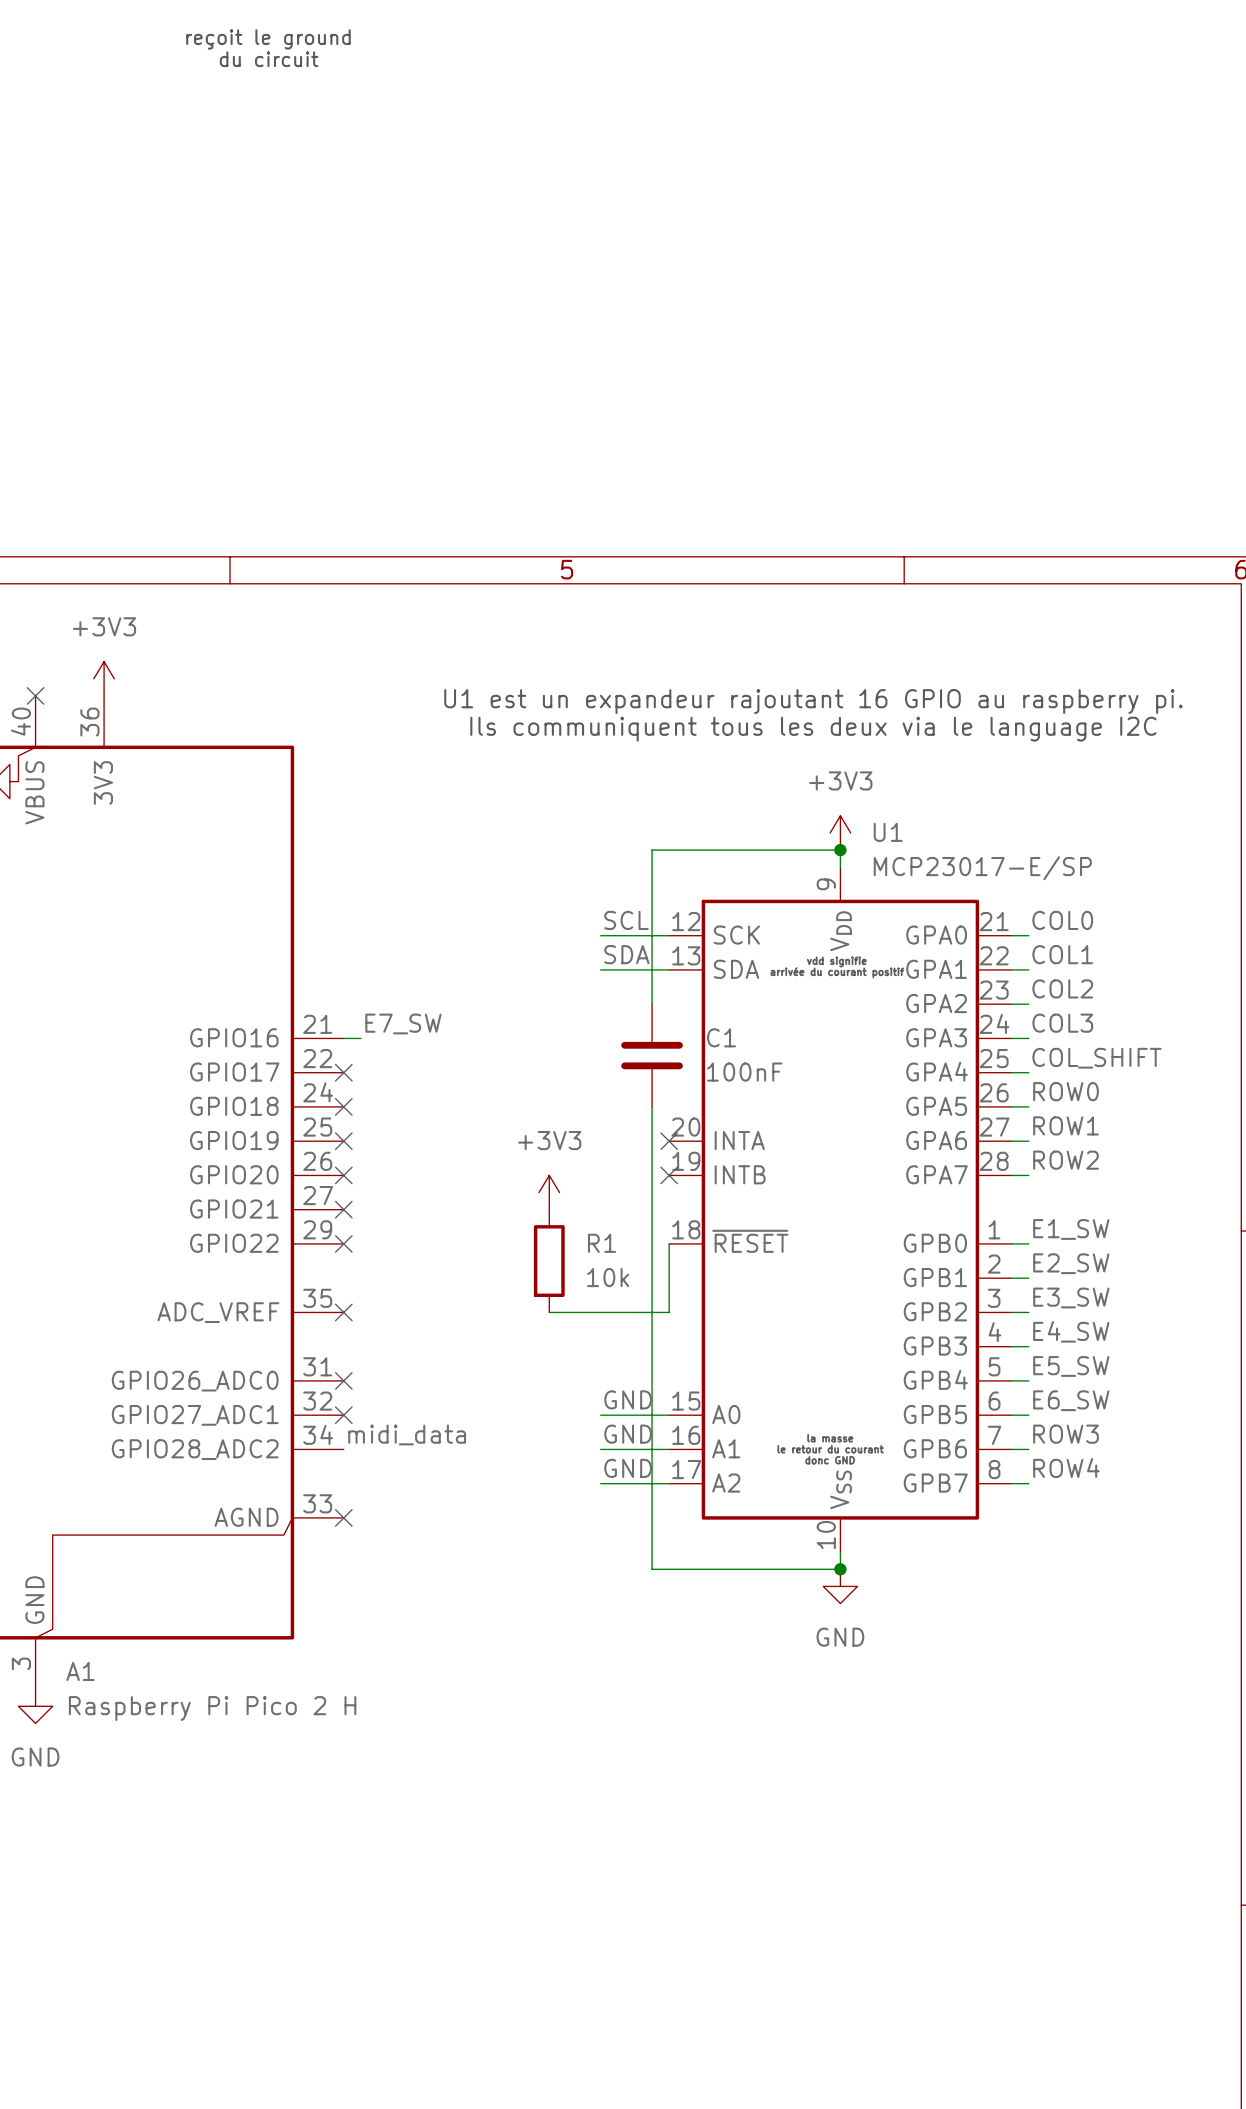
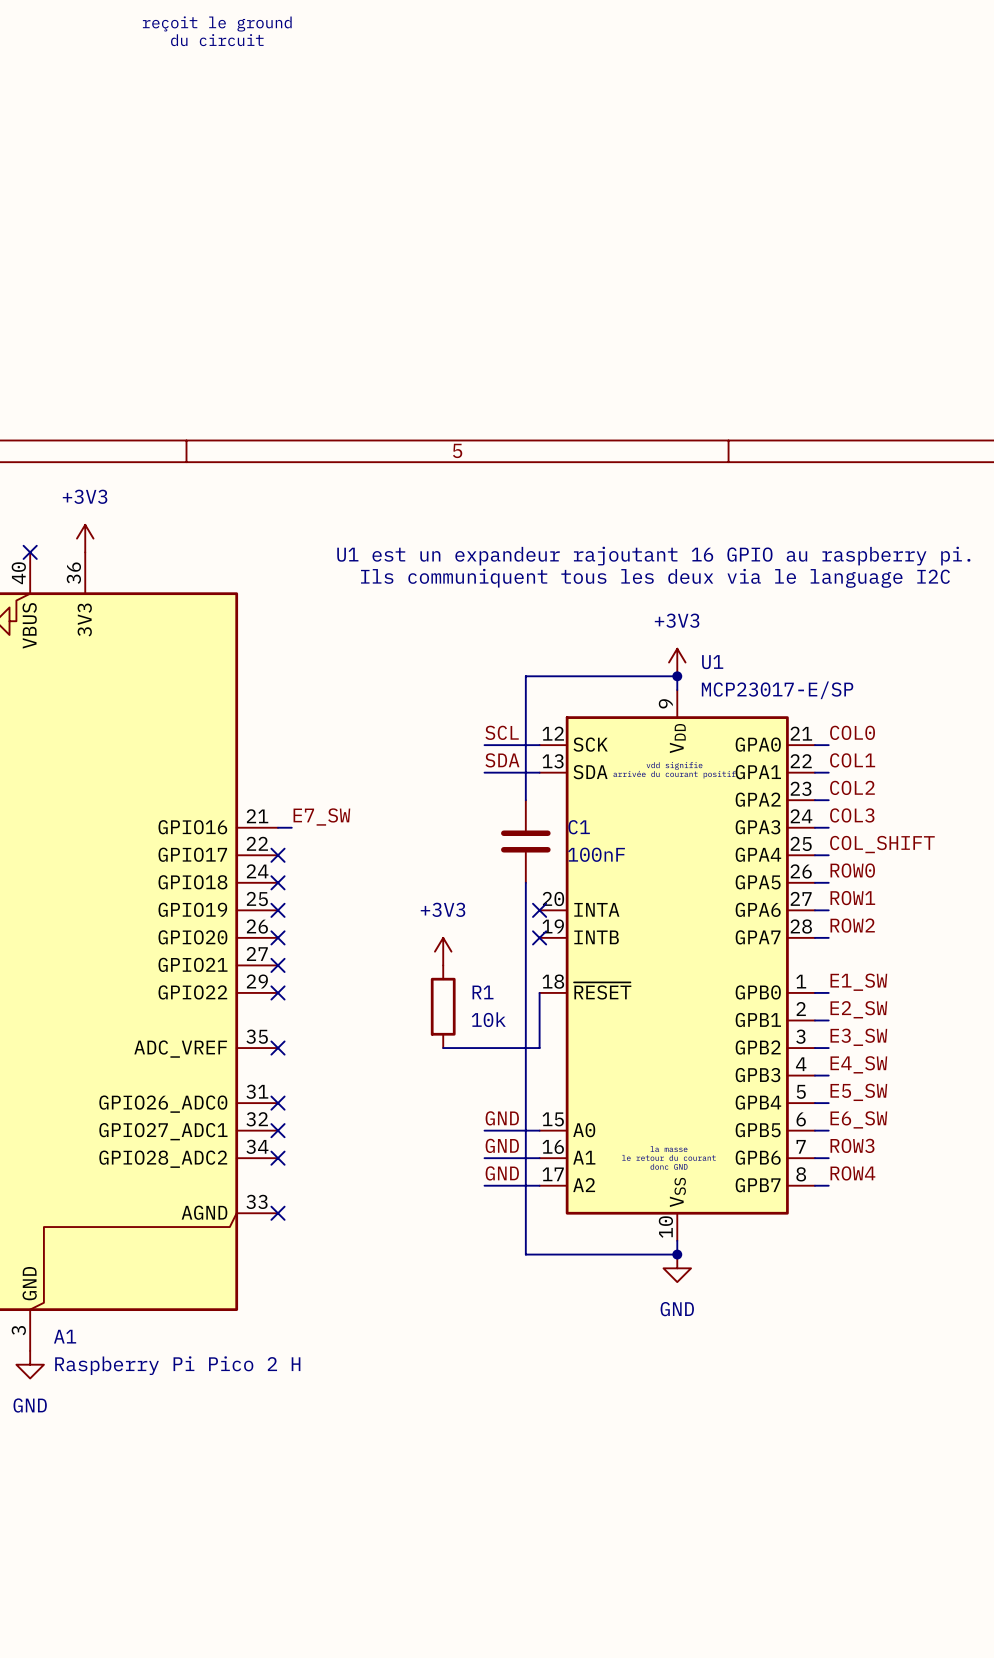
label: midi_data (407, 1434) -> none
no-connect mark: none -> (278, 1158)

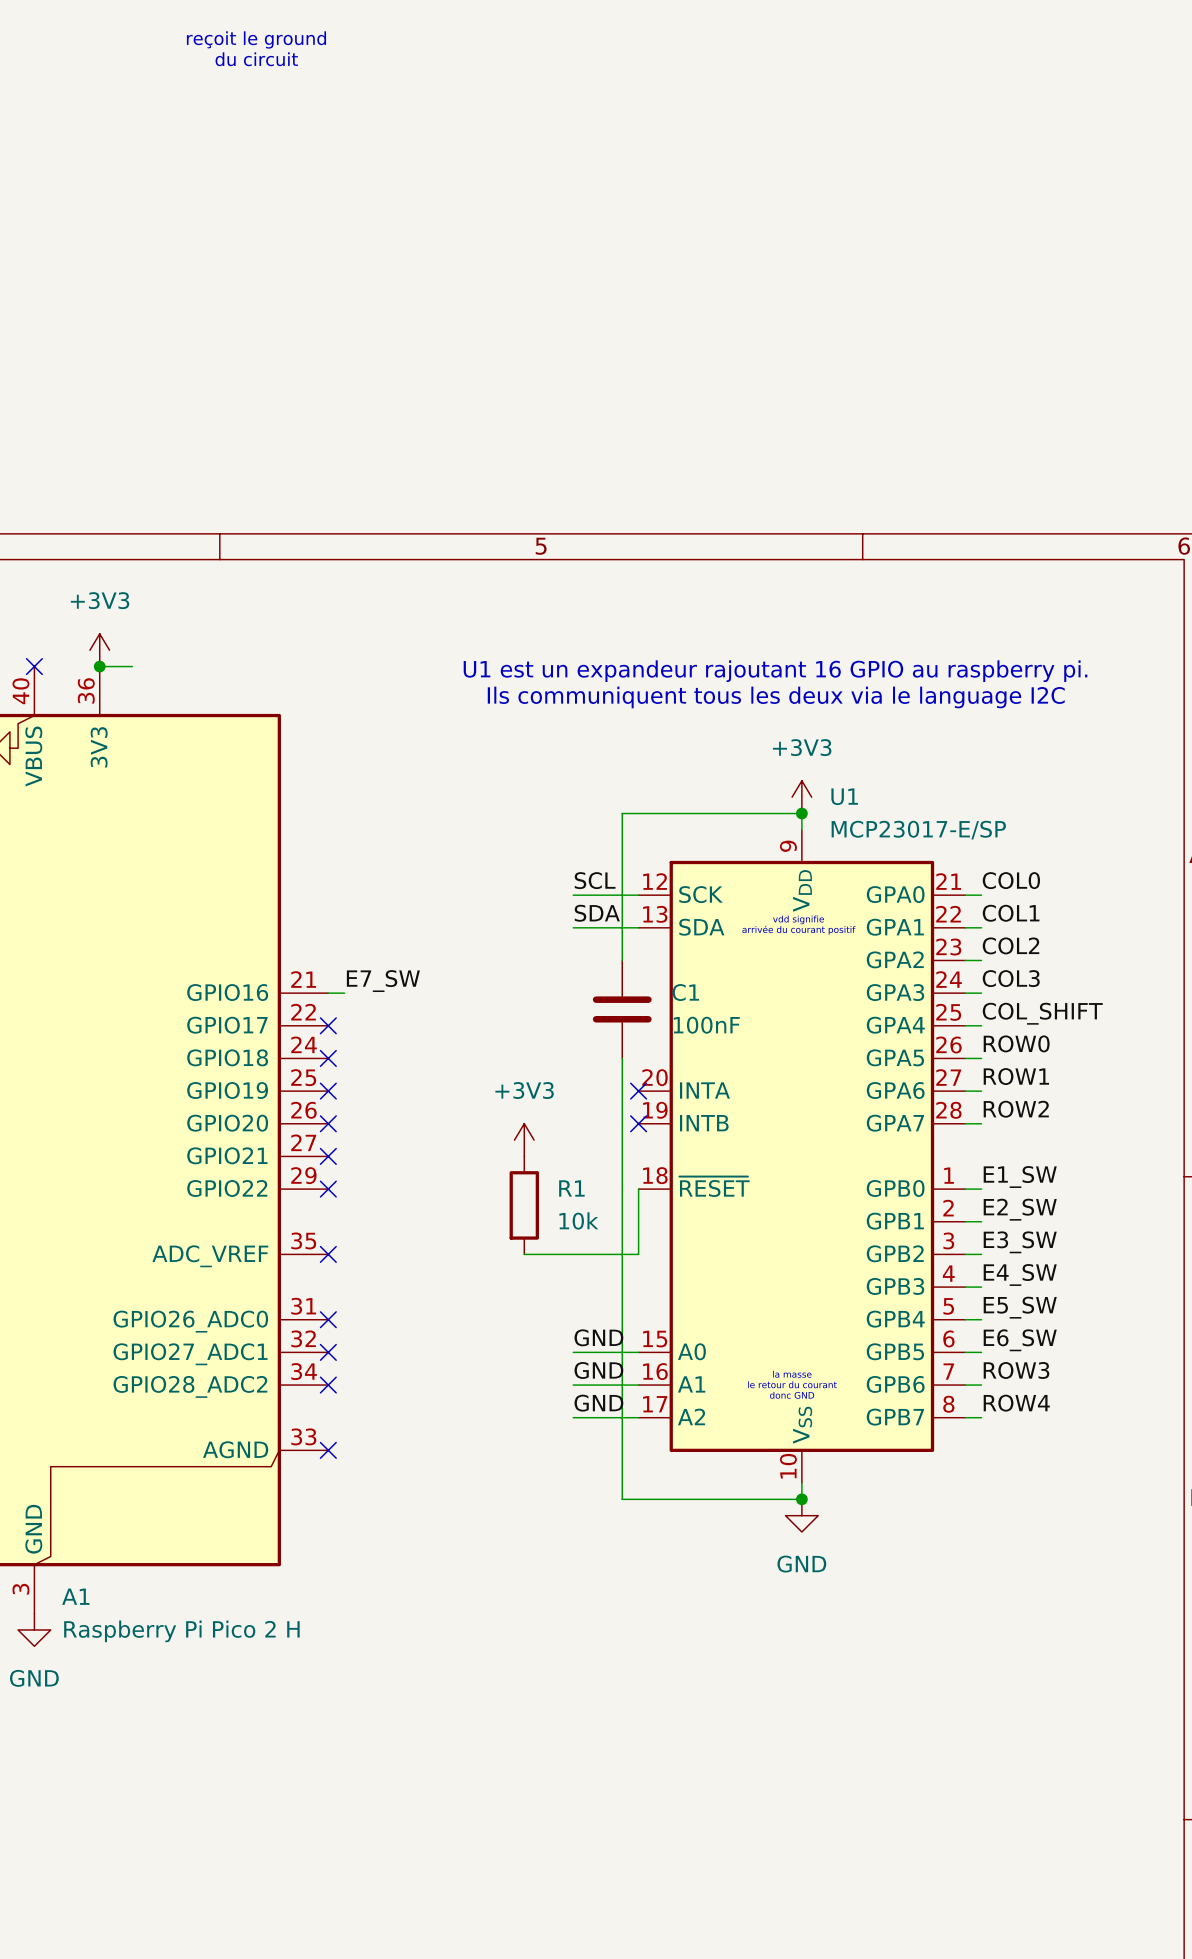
wire: none -> (99, 666) (132, 666)
junction: none -> (99, 666)

